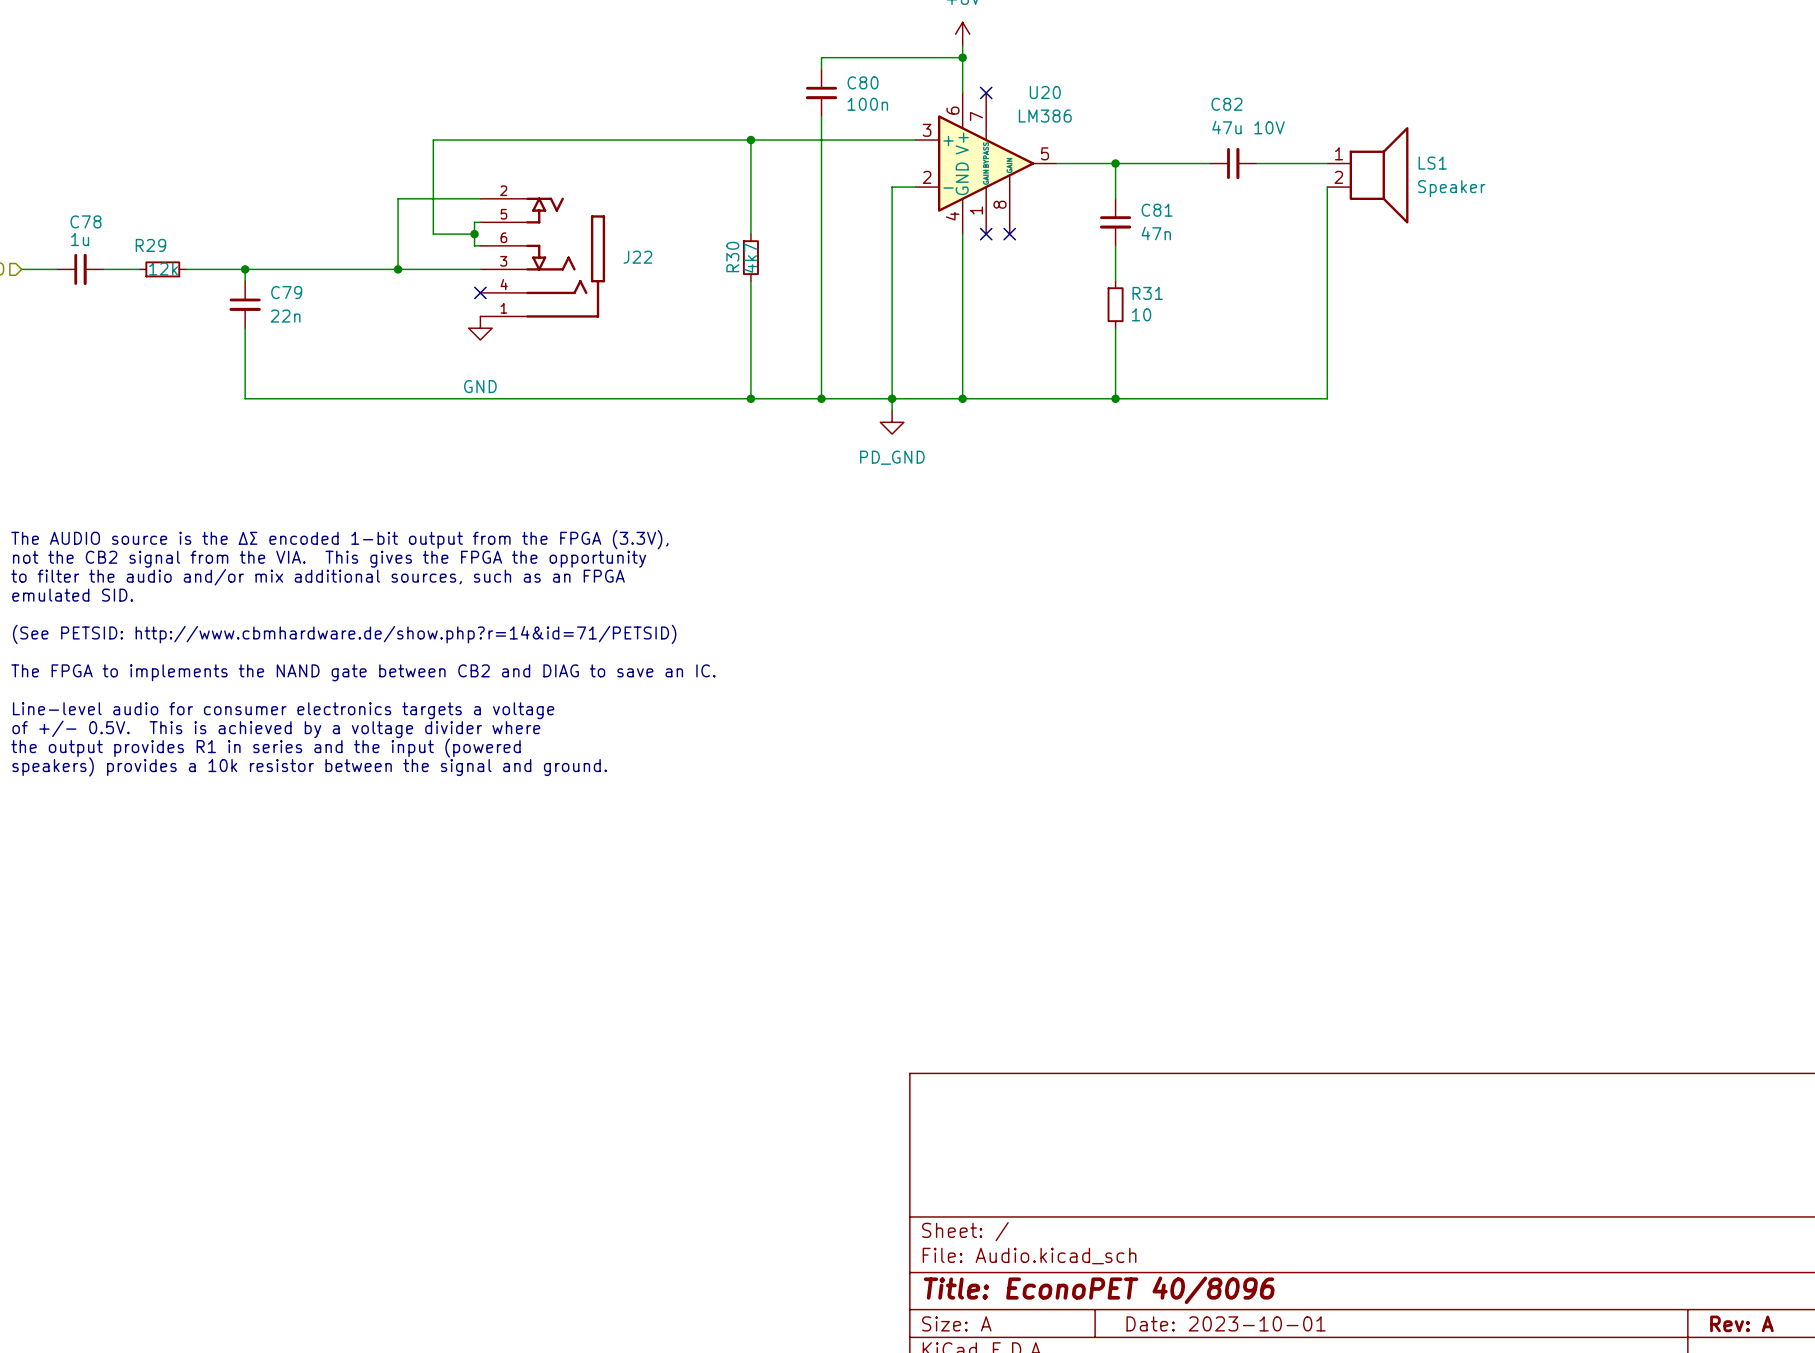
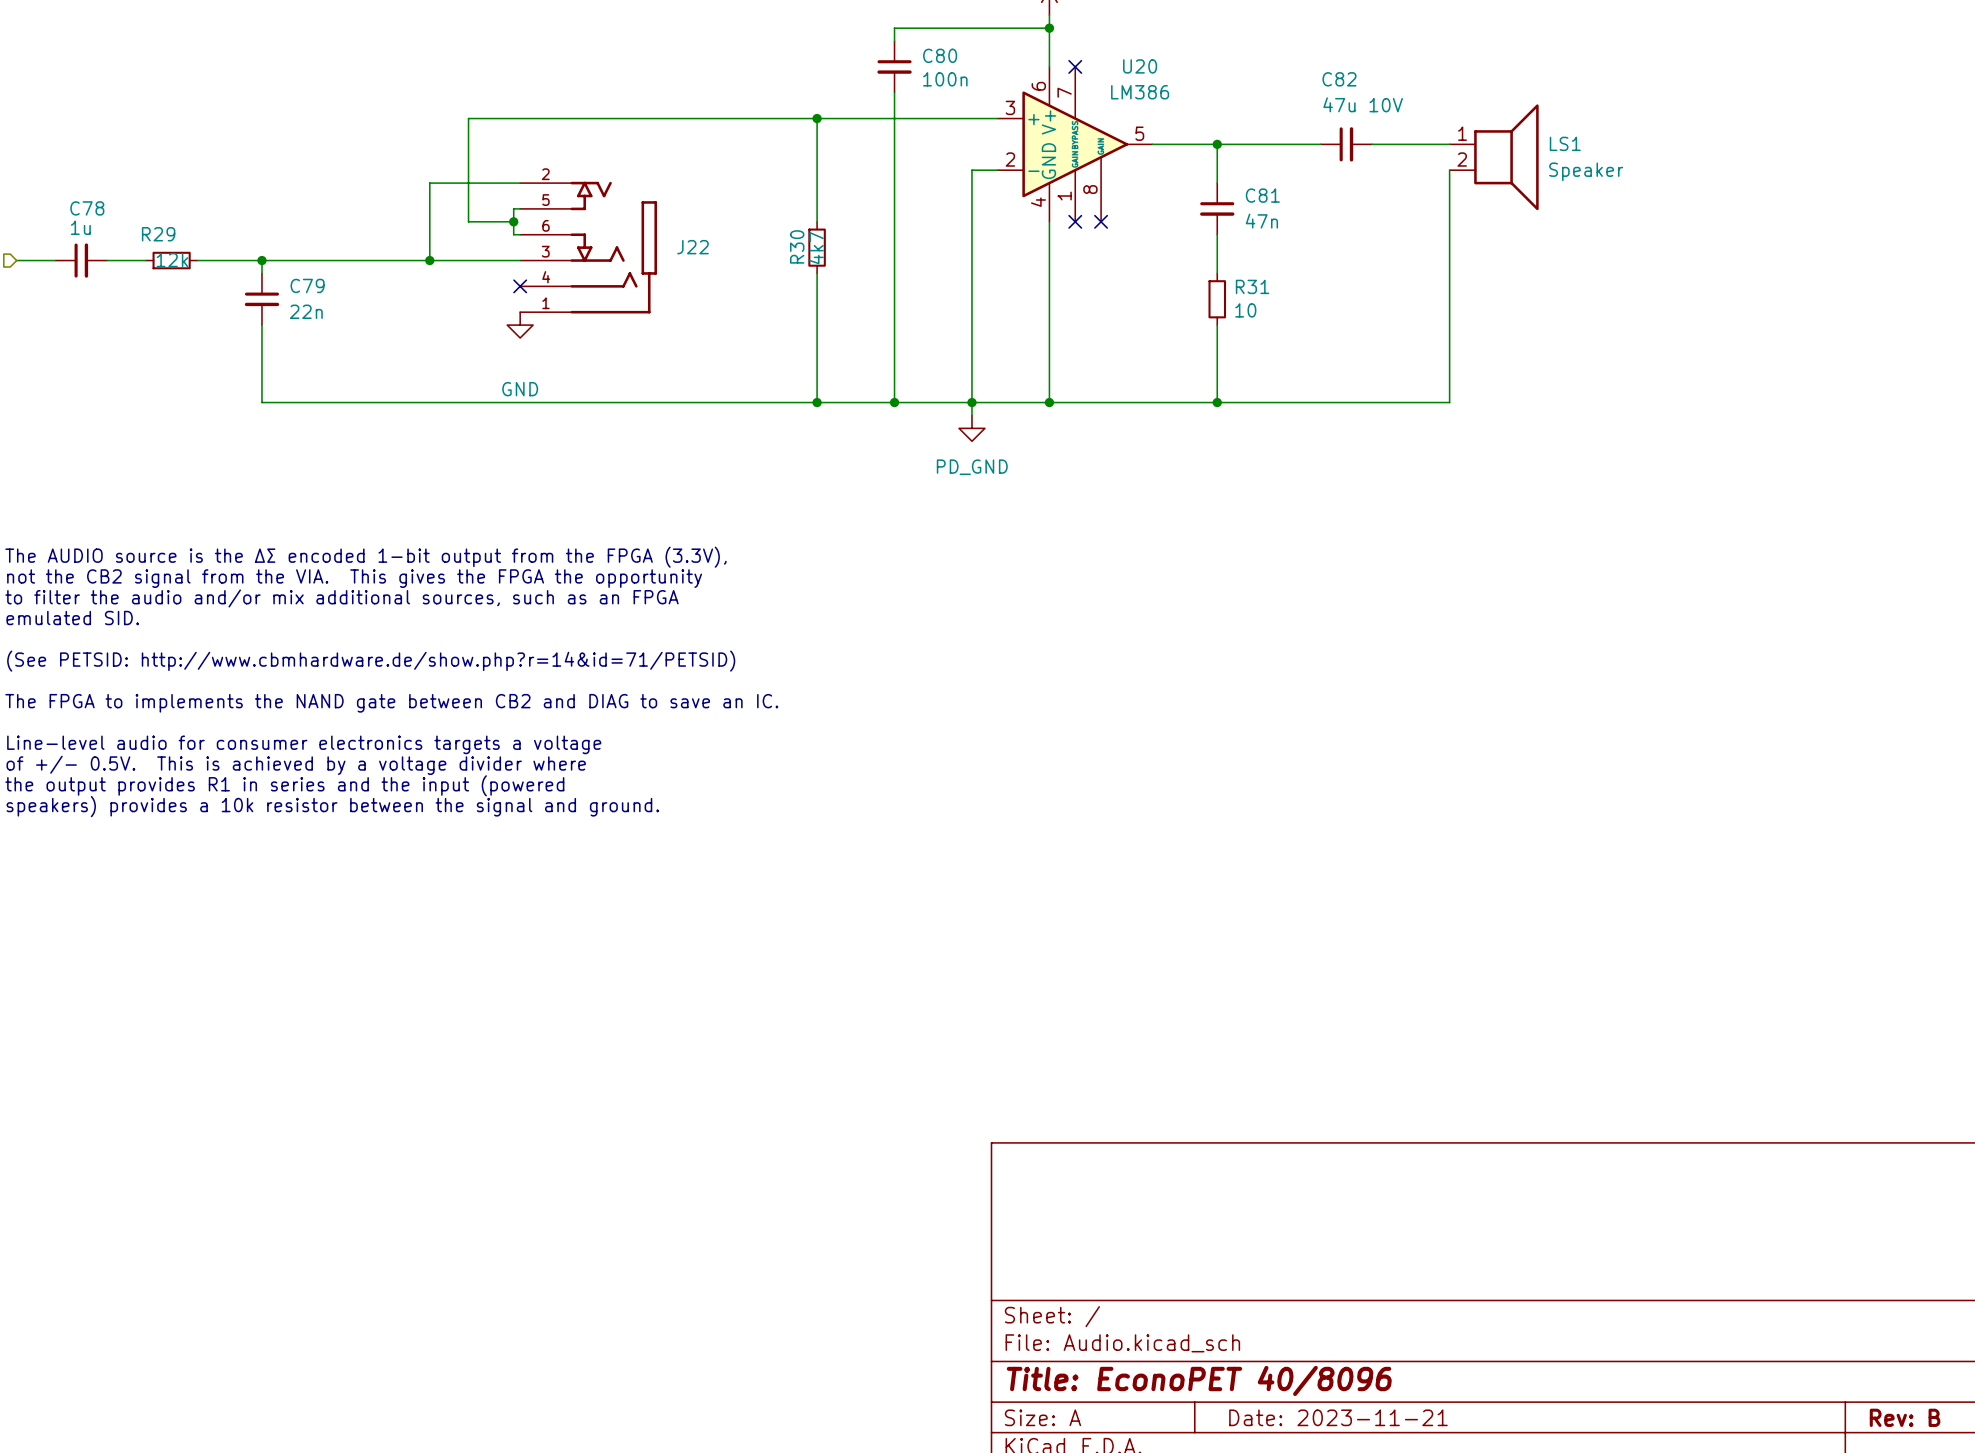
title block: Date: 2023-10-01 (1226, 1323) -> Date: 2023-11-21 (1338, 1417)
title block: Rev: A (1741, 1323) -> Rev: B (1905, 1417)

